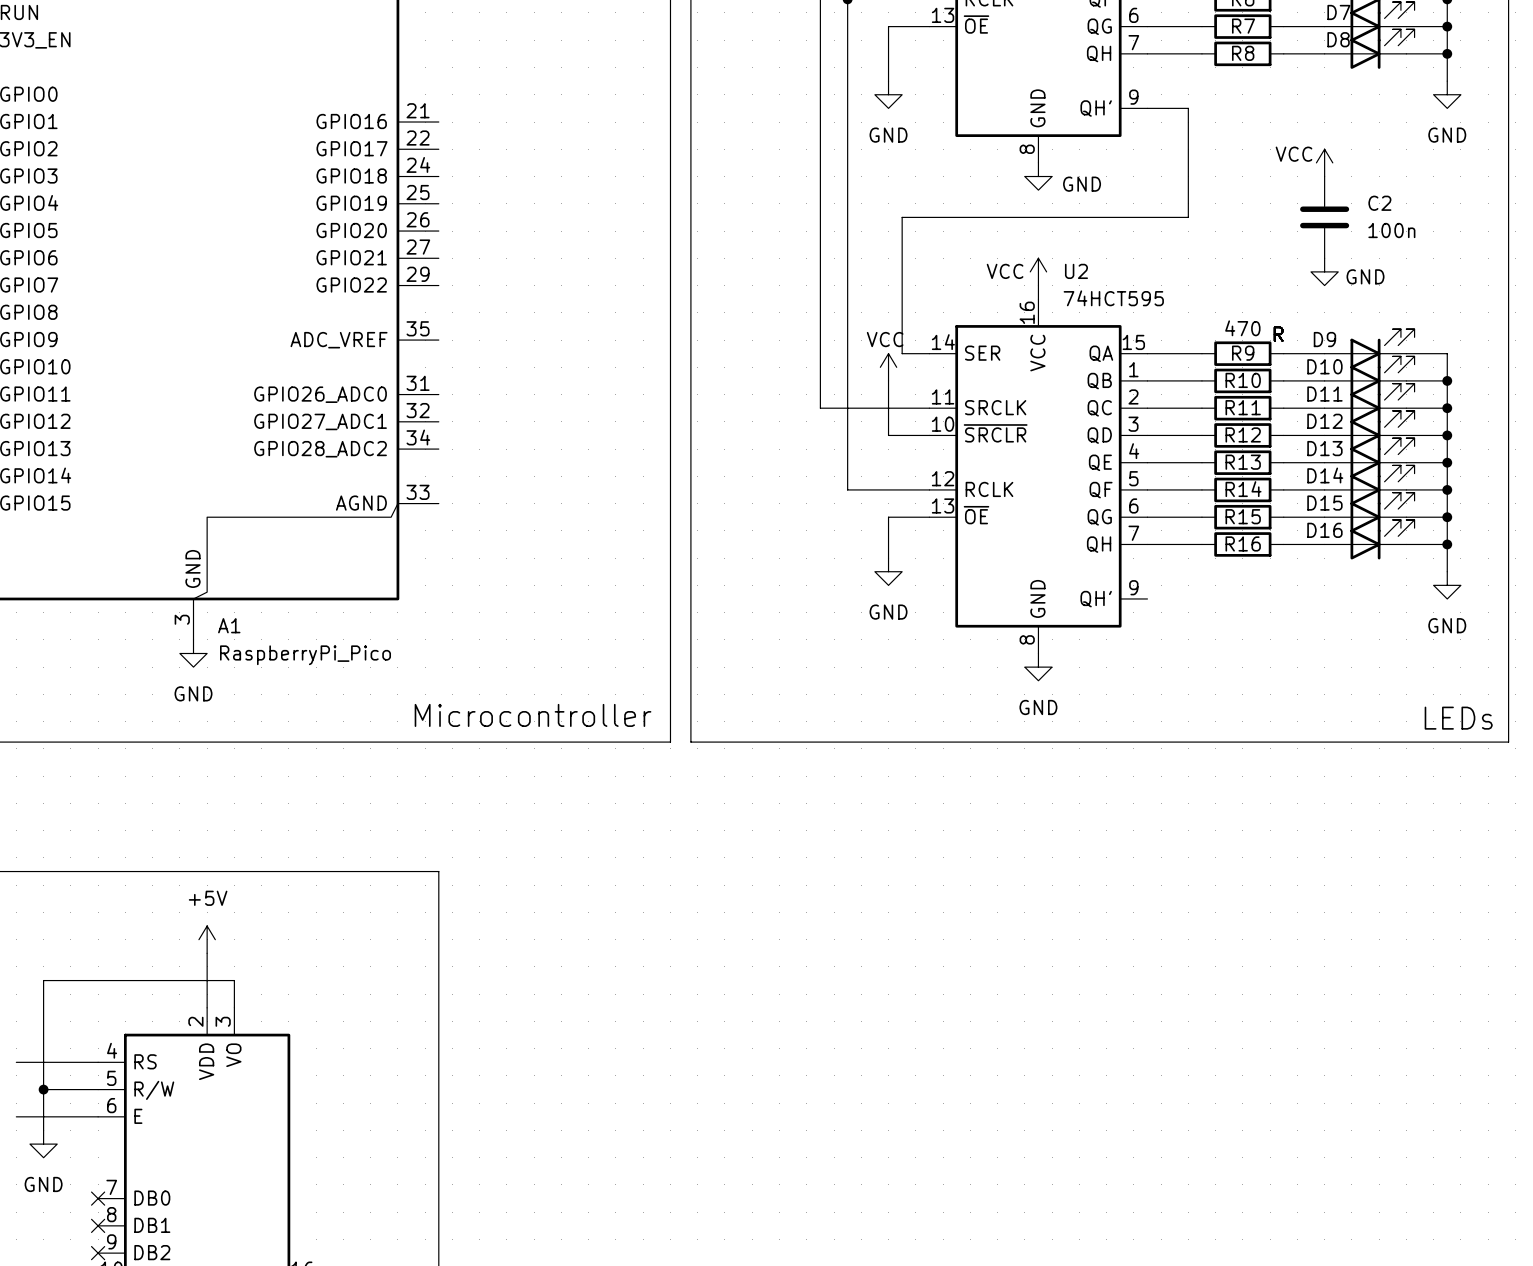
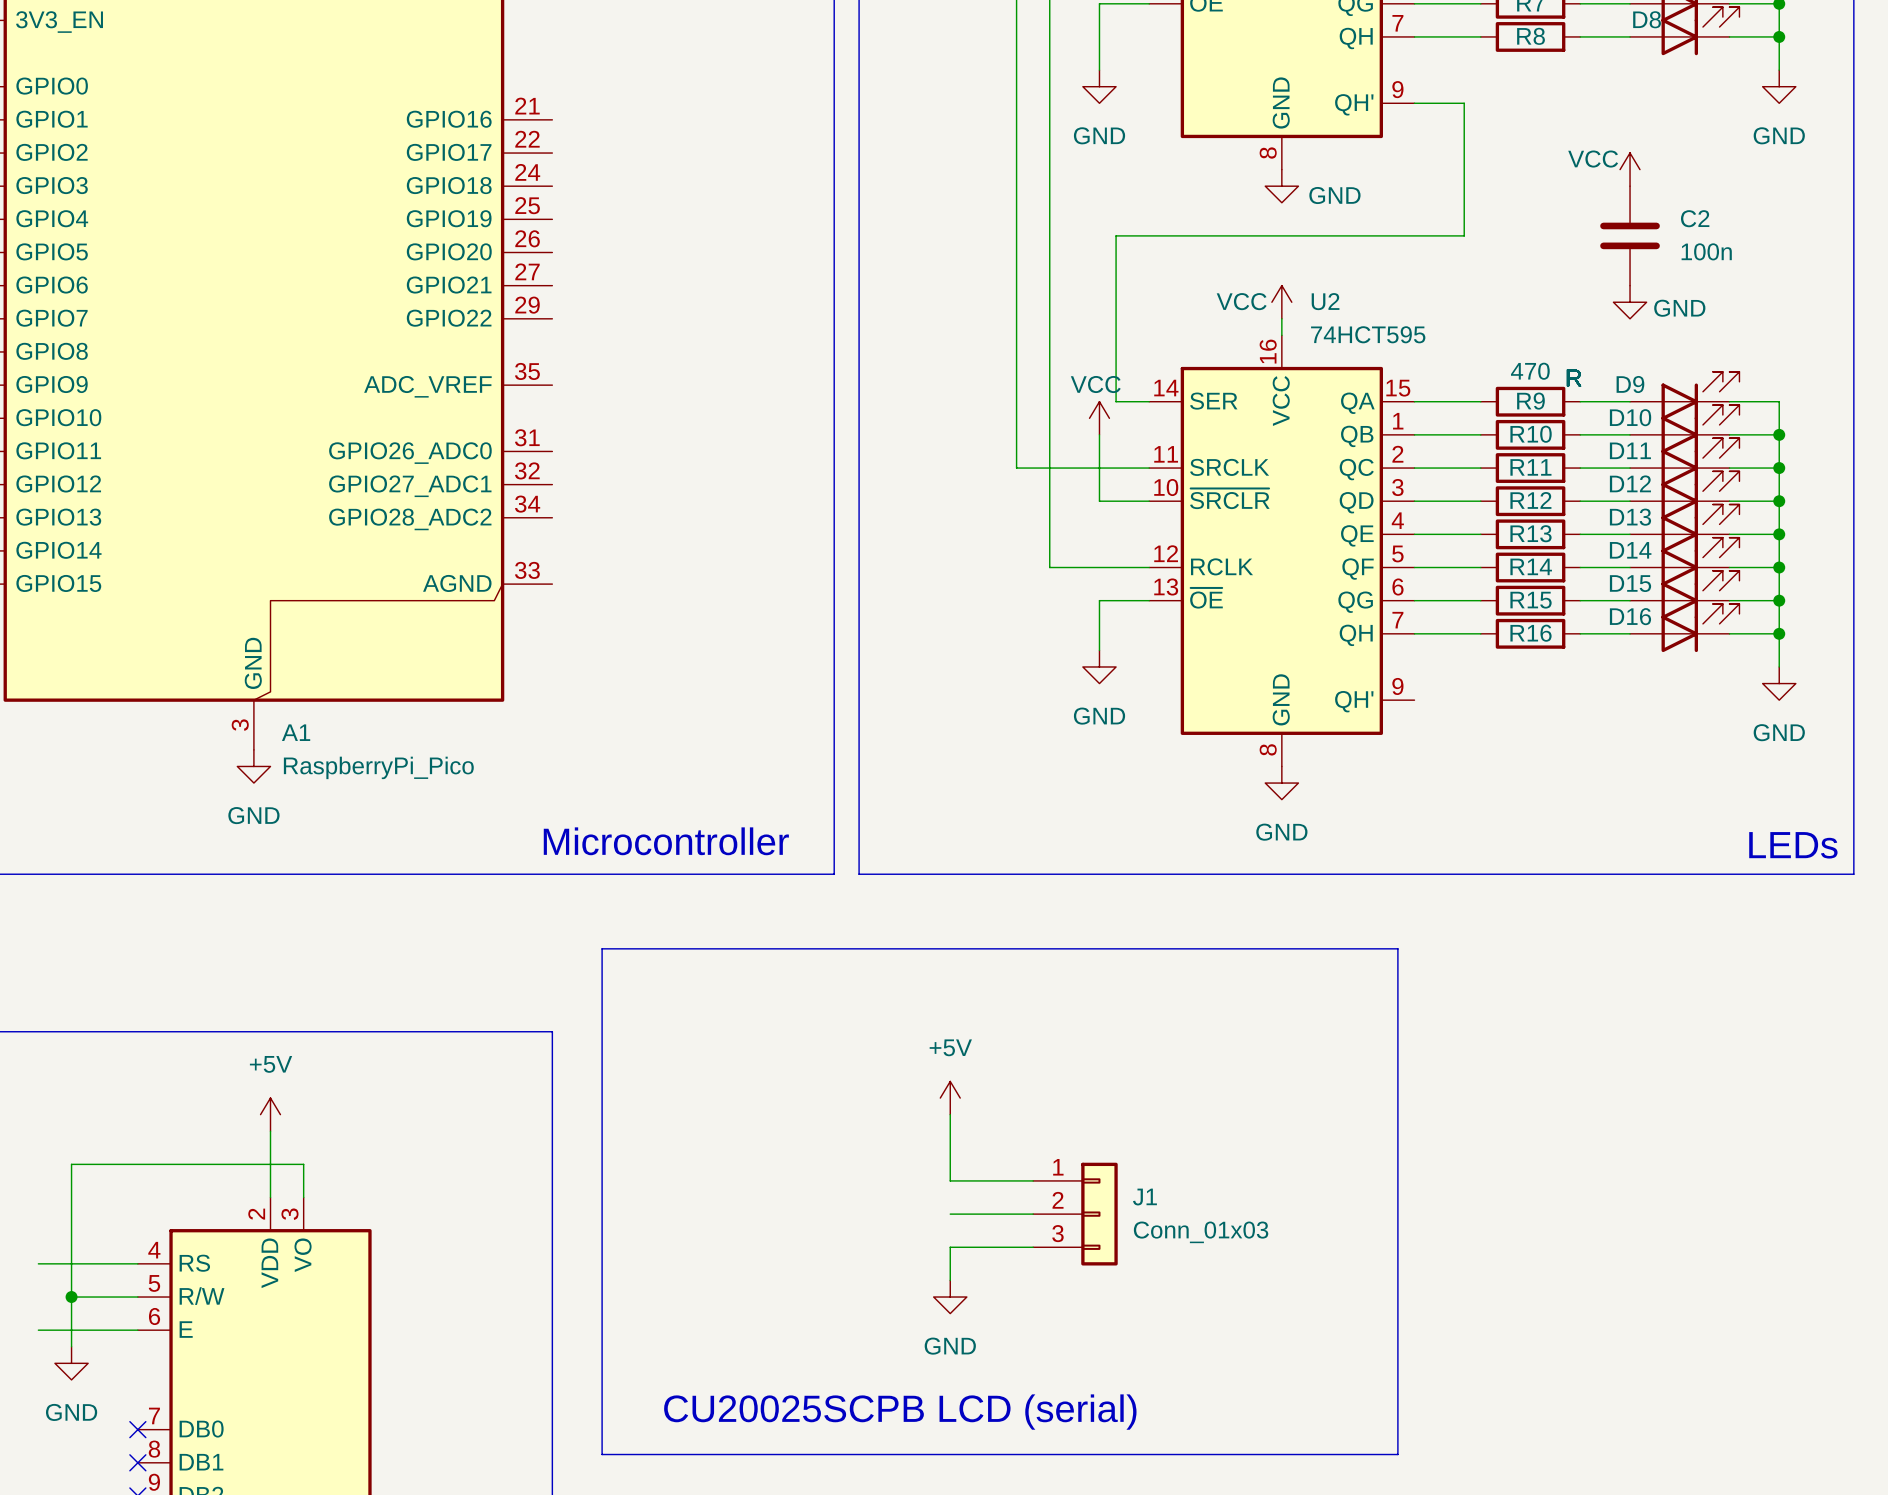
line: none -> (602, 948) (1397, 948) (1397, 1454) (602, 1454) (602, 948)
power symbol: none -> +5V (950, 1098)
wire: none -> (950, 1114) (950, 1180) (1033, 1180)
wire: none -> (950, 1214) (1033, 1214)
J1: none -> Conn_01x03 (1075, 1214)
wire: none -> (1033, 1247) (950, 1247) (950, 1280)
power symbol: none -> GND (950, 1297)
text: none -> CU20025SCPB LCD (serial) (900, 1412)

